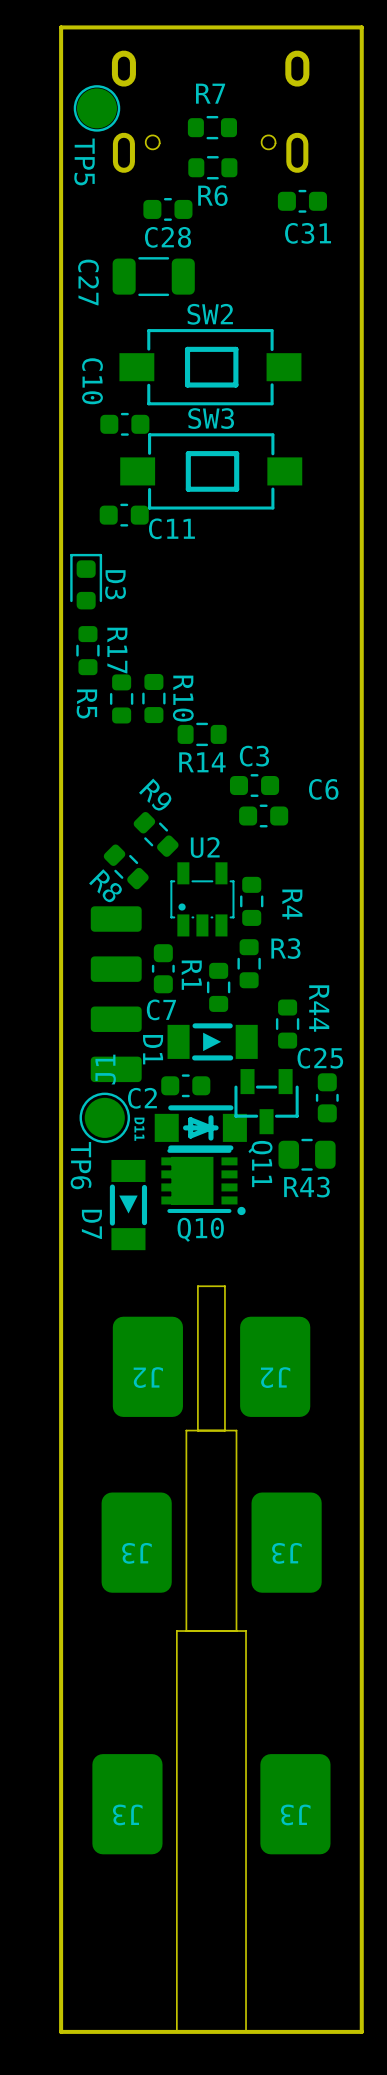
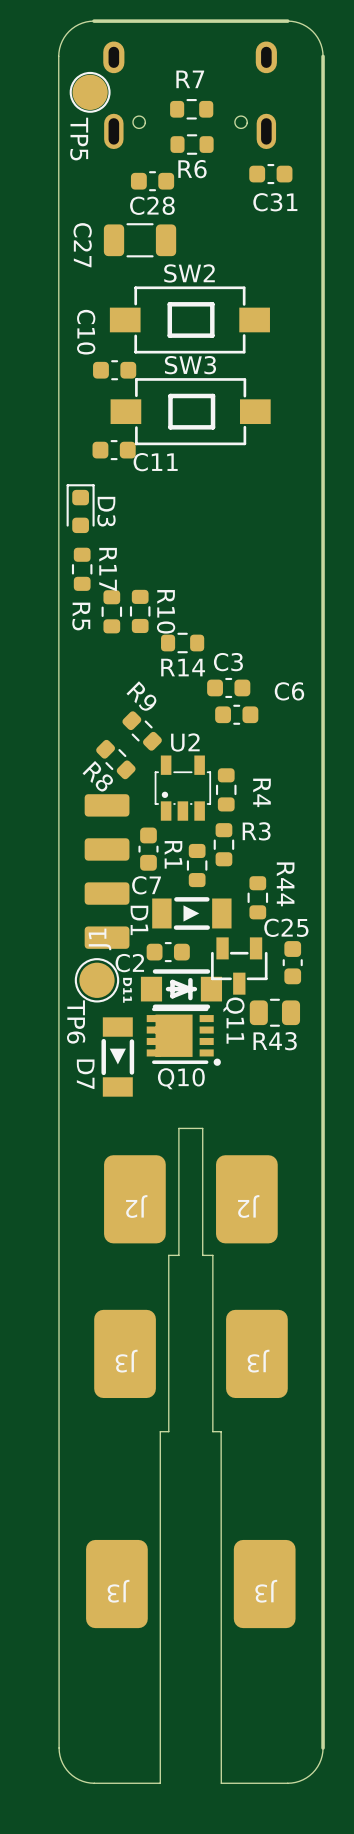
board edge: (101, 27) (61, 27) (61, 2031) (361, 2031) (361, 1990) -> (94, 21) (82, 23) (69, 31) (60, 44) (58, 56) (59, 1748) (61, 1759) (66, 1769) (75, 1777) (86, 1782) (160, 1783) (160, 1431)
board edge: (321, 27) (361, 27) (361, 67) -> (287, 21) (299, 23) (312, 31) (319, 41) (323, 56)
board edge: (224, 1430) (197, 1430) -> none
board edge: (236, 1631) (186, 1631) -> none
board edge: (246, 1631) (246, 2031) (176, 2031) (176, 1631) -> (221, 1431) (221, 1783) (287, 1783) (299, 1781) (309, 1775) (317, 1766) (323, 1748)

